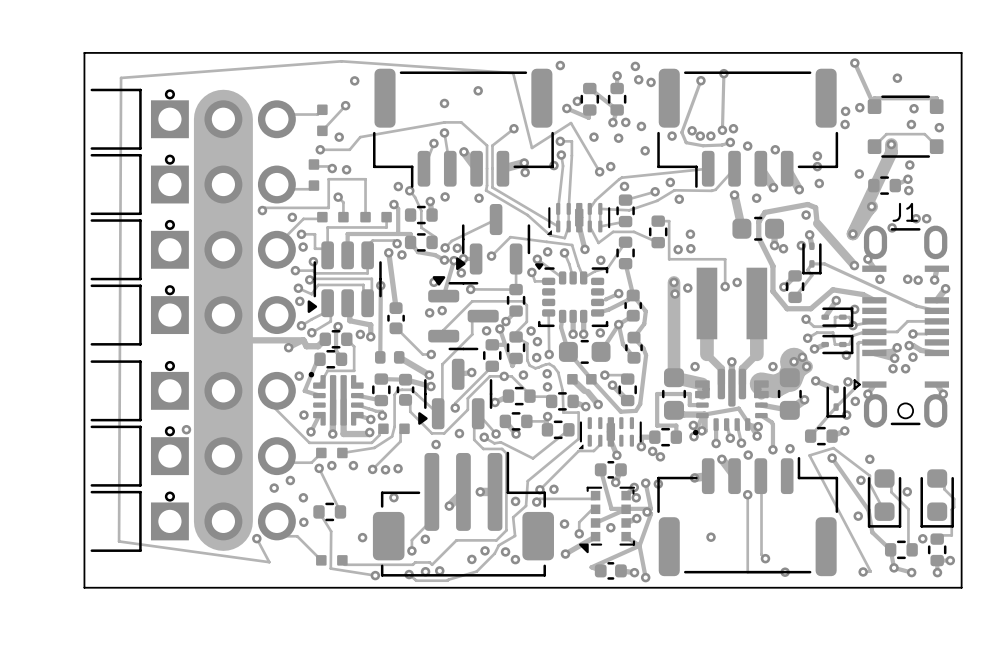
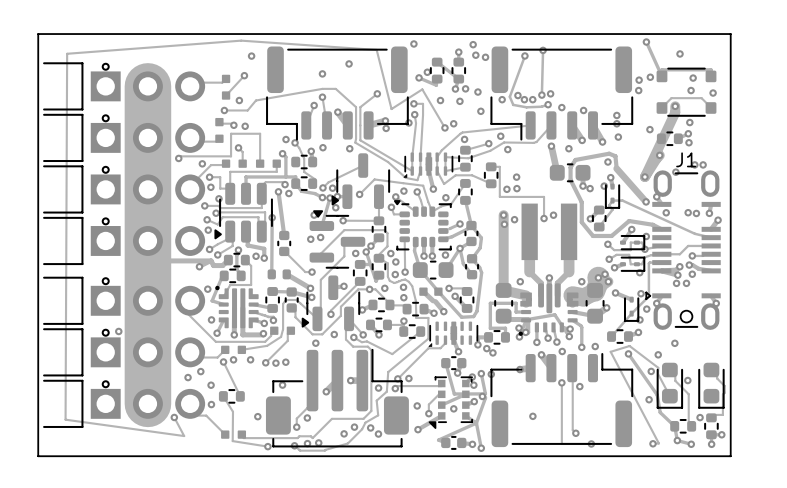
via: none -> (674, 343)
via: none -> (579, 386)

